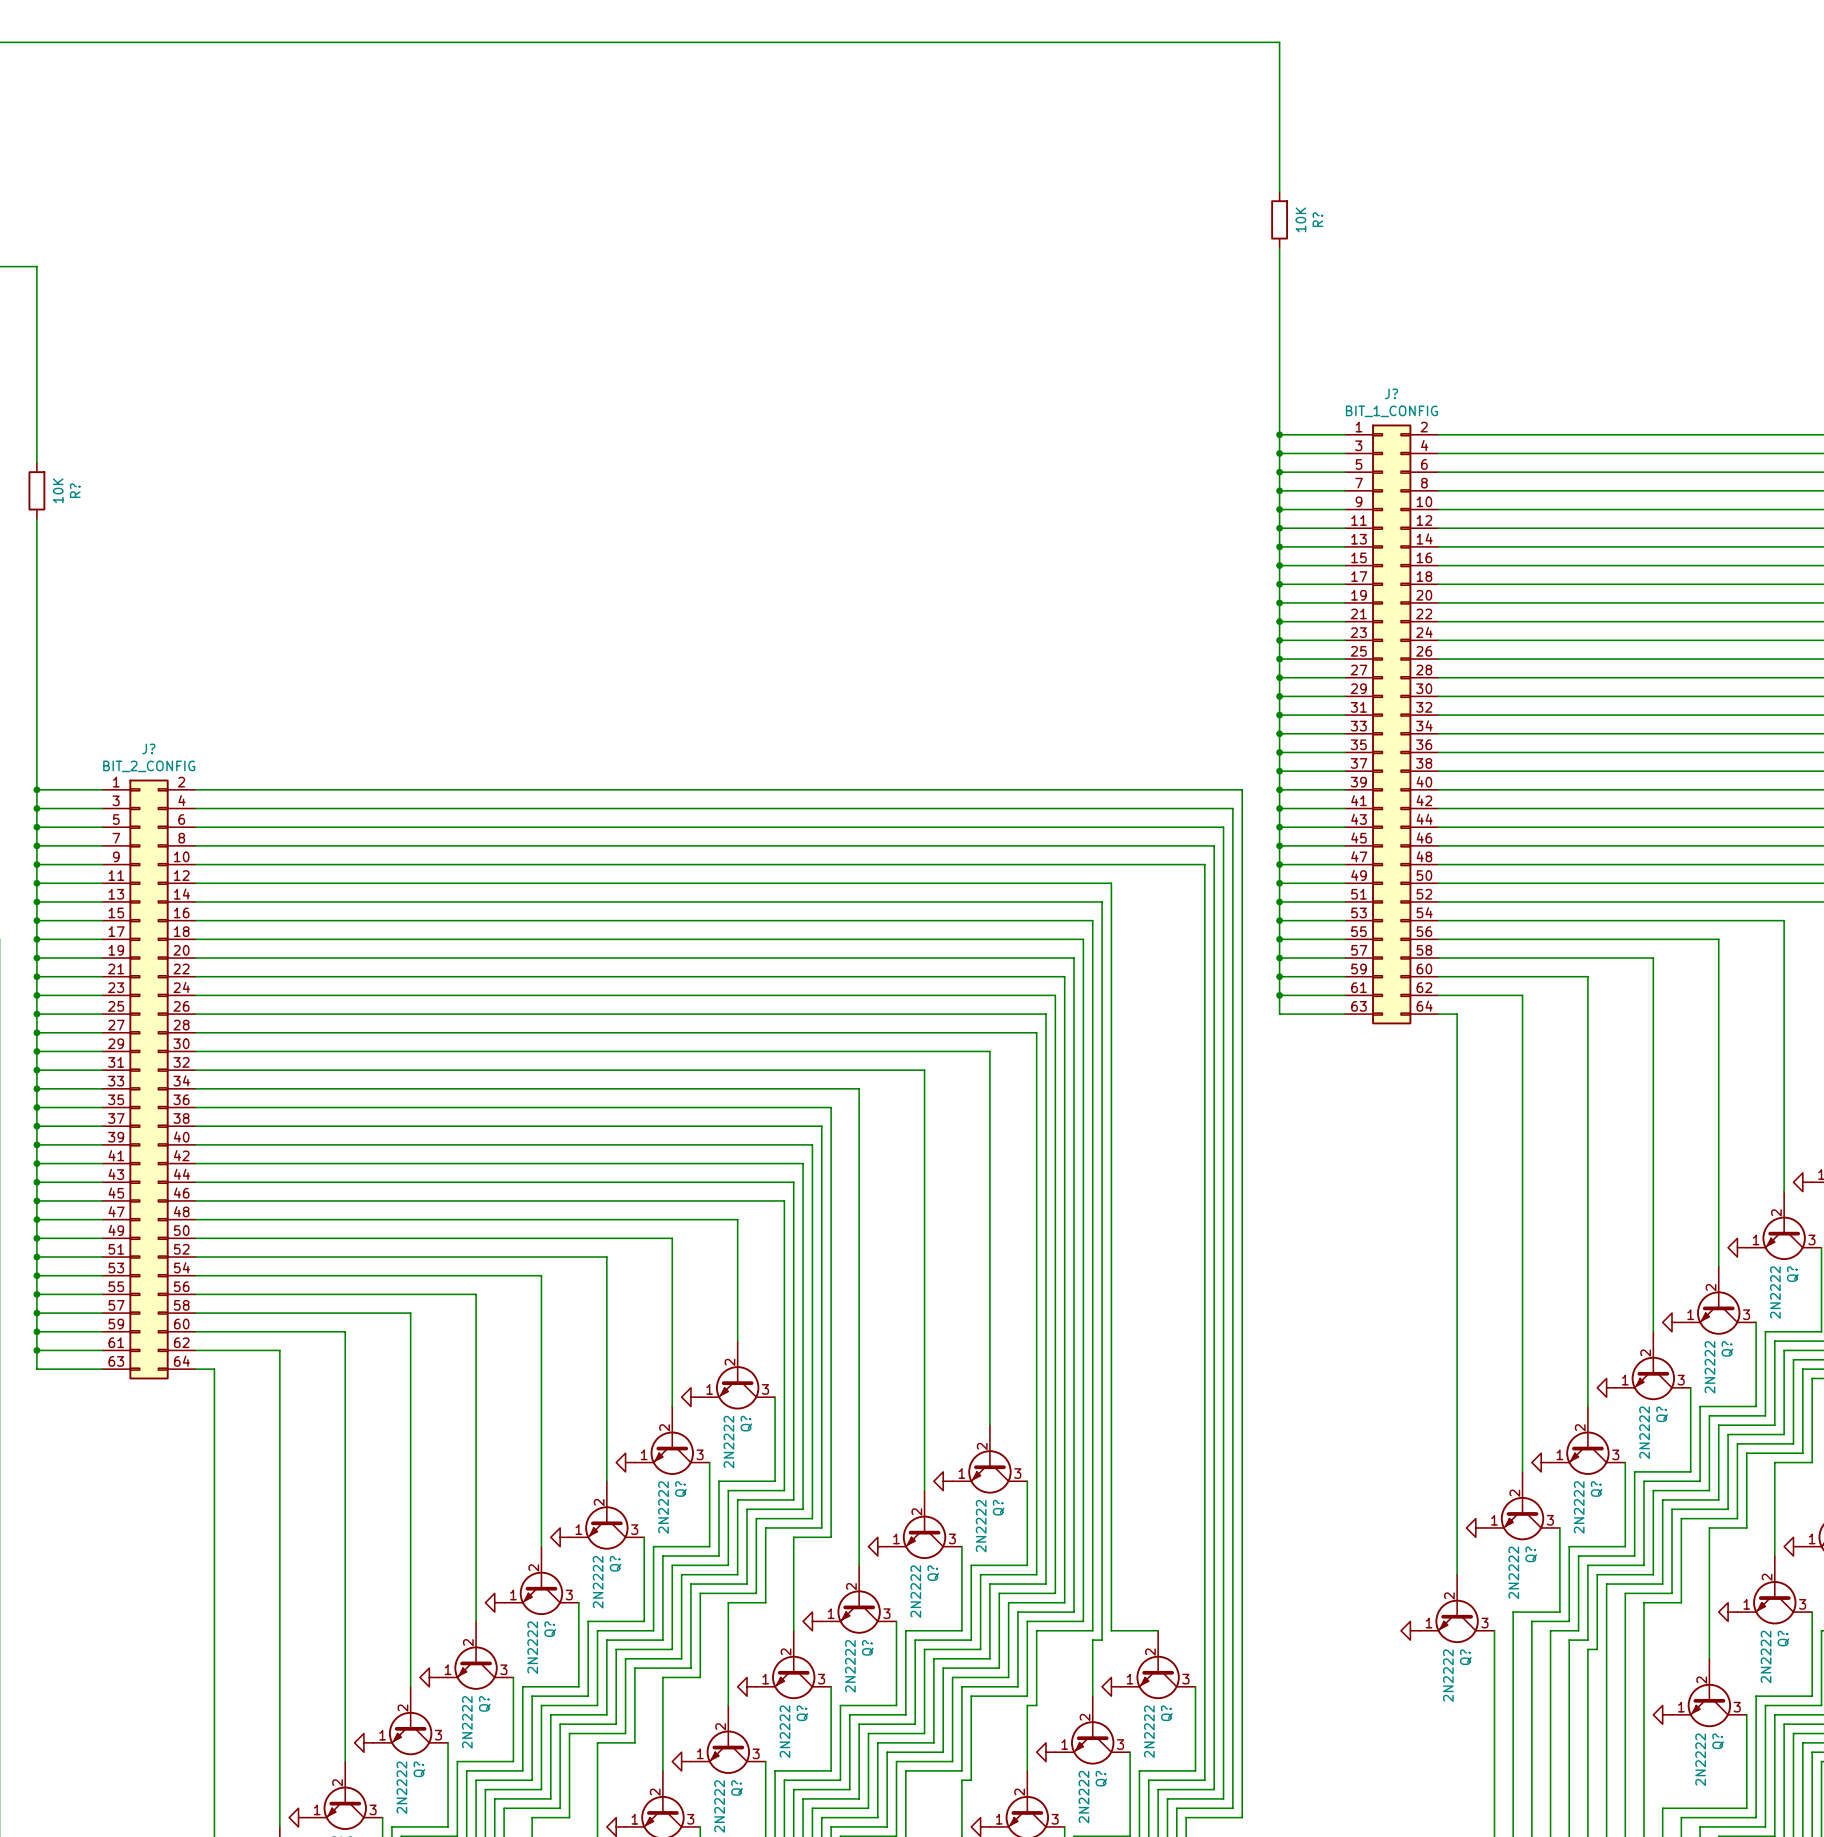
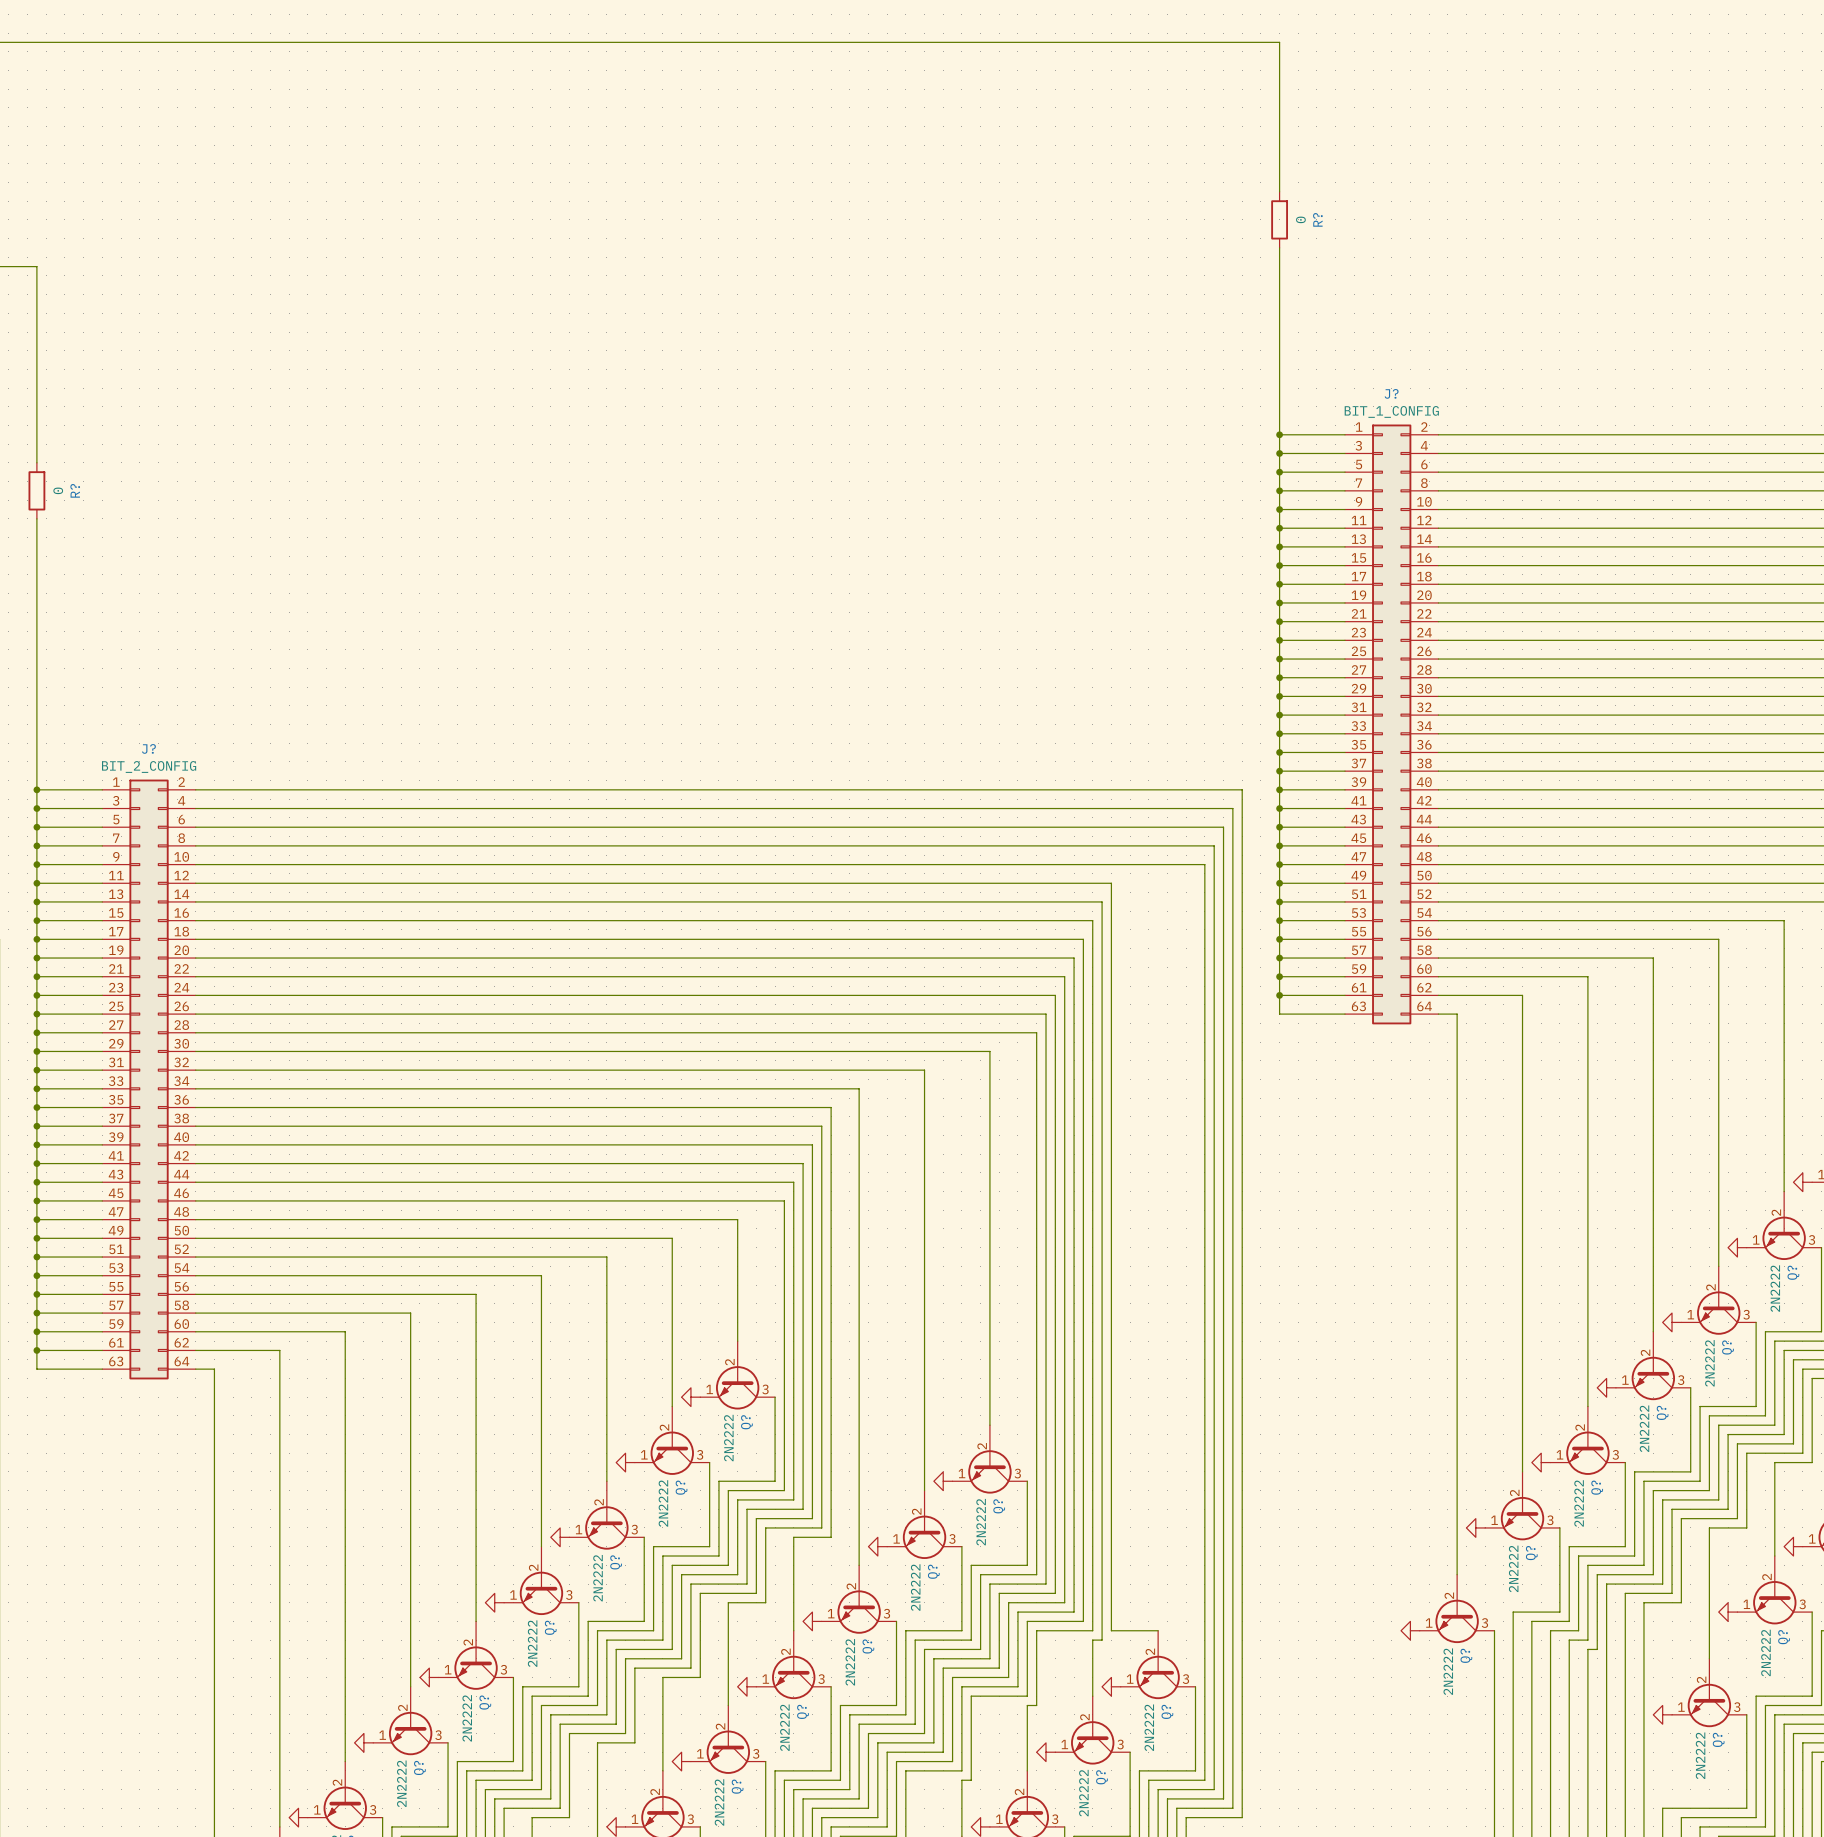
R? value: 10K (1300, 219) -> 0 (1300, 219)
R? value: 10K (58, 490) -> 0 (58, 490)

